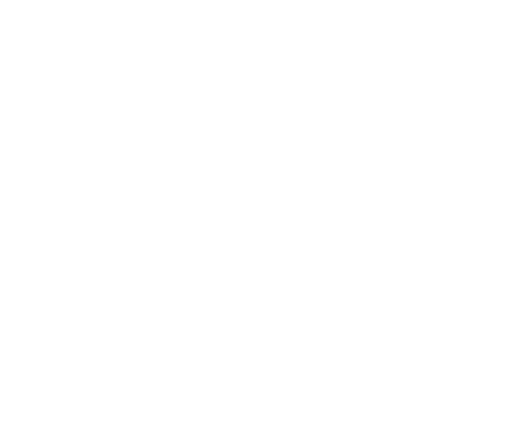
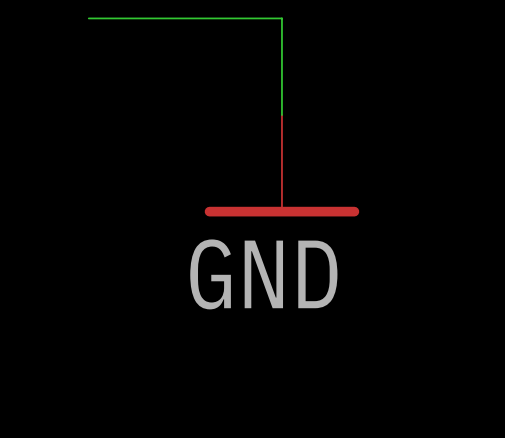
wire: none -> (88, 18) (281, 18) (281, 115)
power symbol: none -> GND (281, 165)

